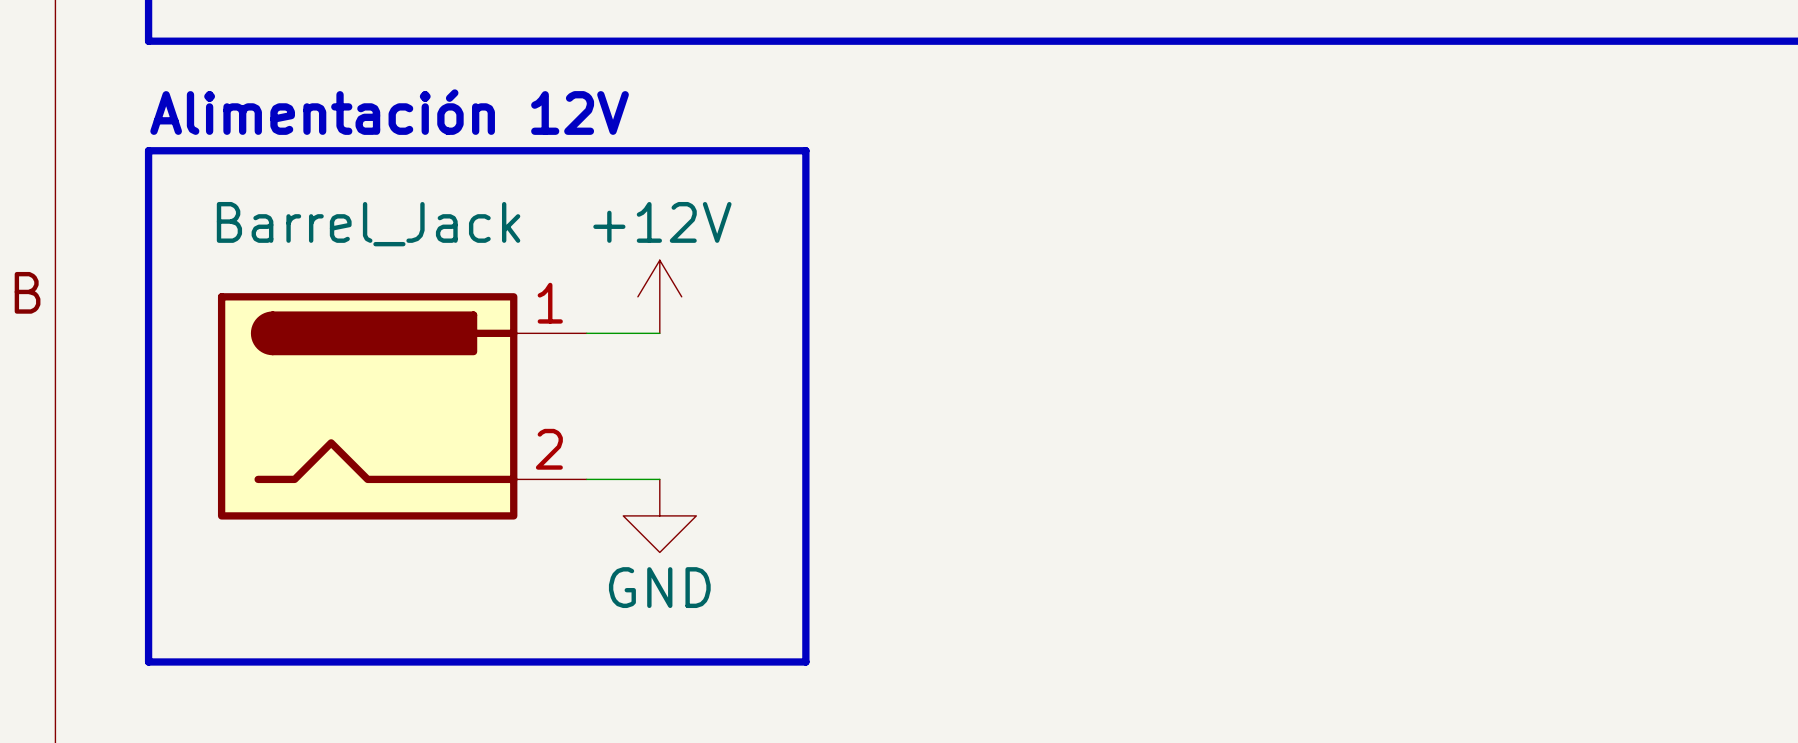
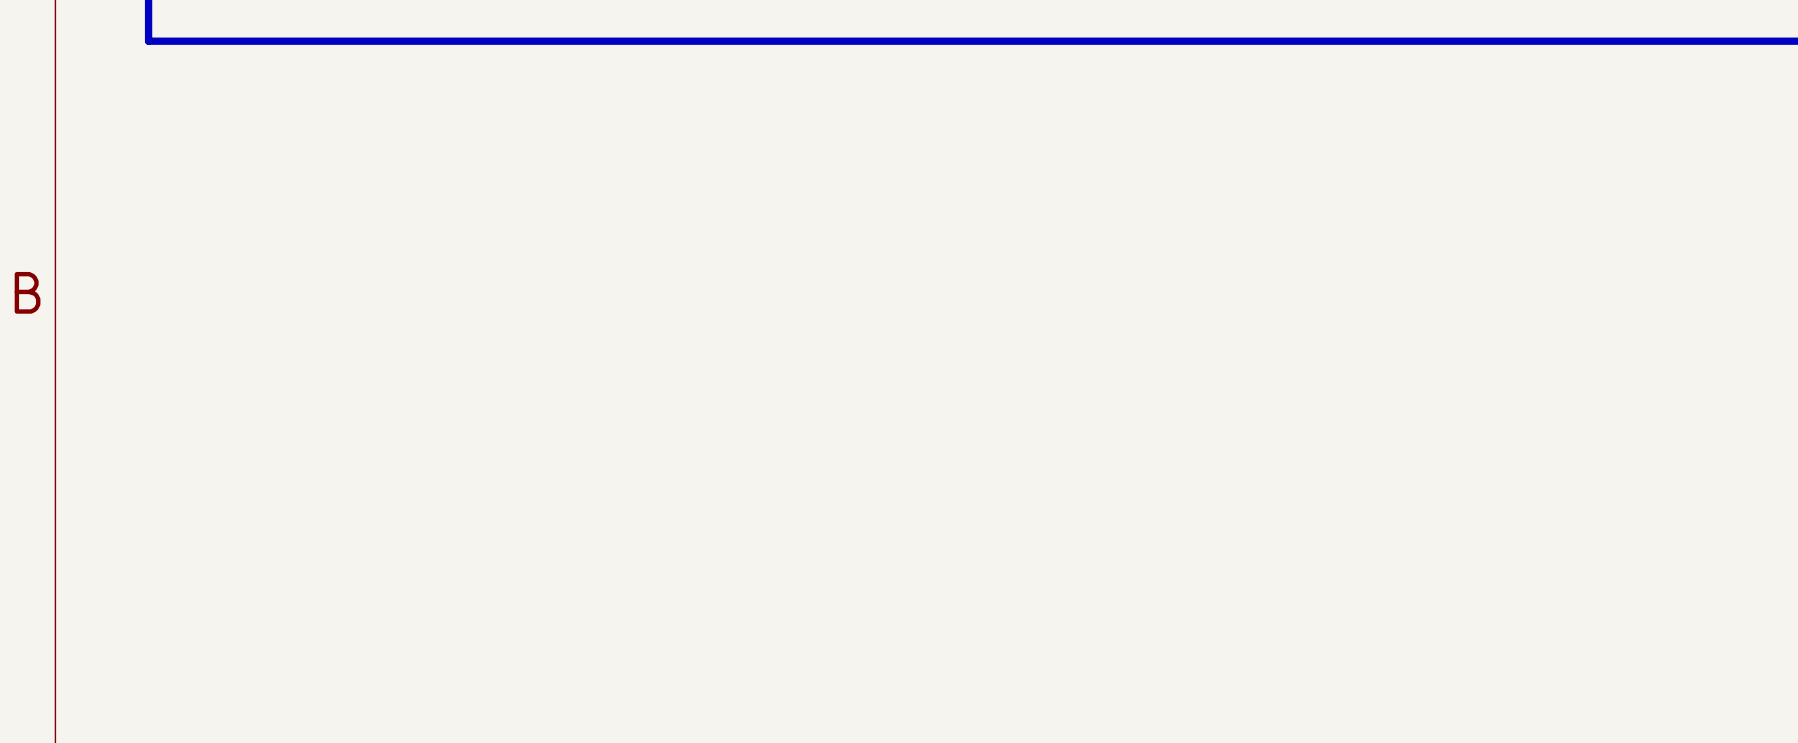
text: Alimentación 12V (389, 112) -> none
line: (148, 150) (148, 661) (805, 661) (805, 150) (148, 150) -> none
power symbol: +12V (659, 296) -> none
wire: (586, 333) (659, 333) -> none
part: Barrel_Jack (402, 406) -> none
wire: (586, 479) (659, 479) -> none
power symbol: GND (659, 515) -> none

